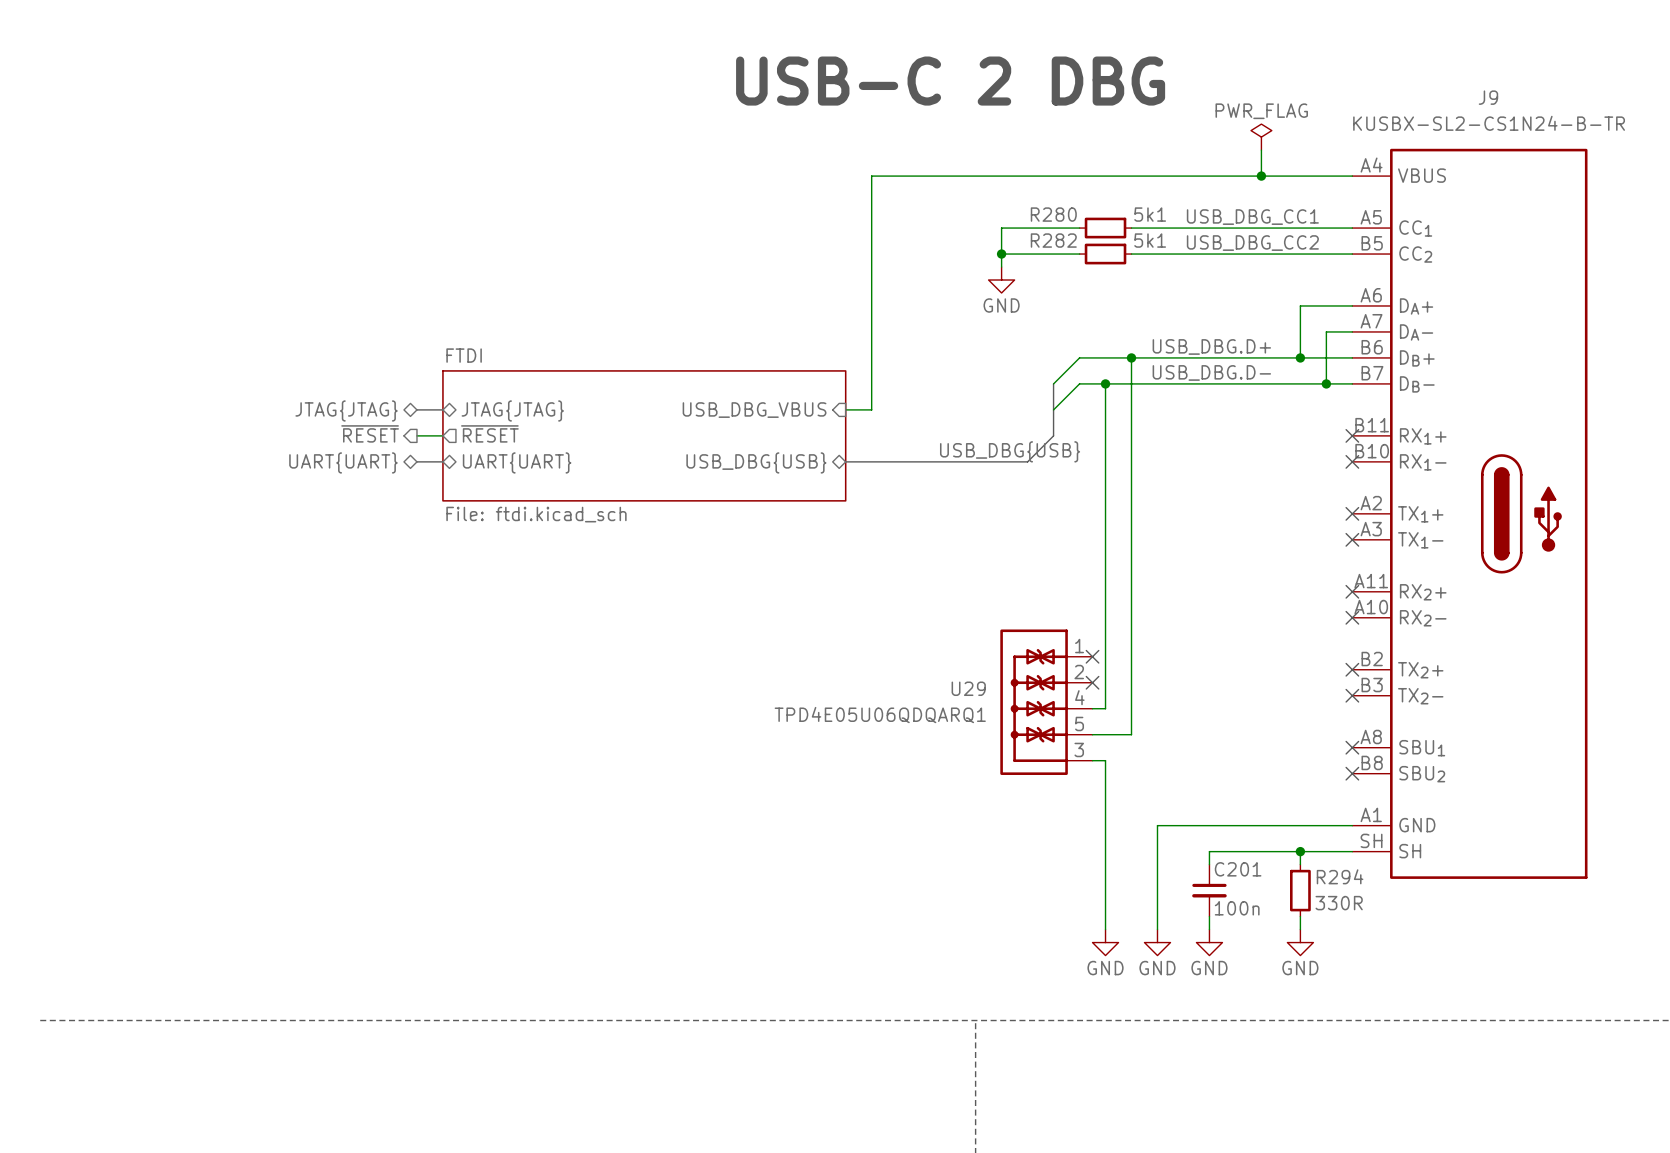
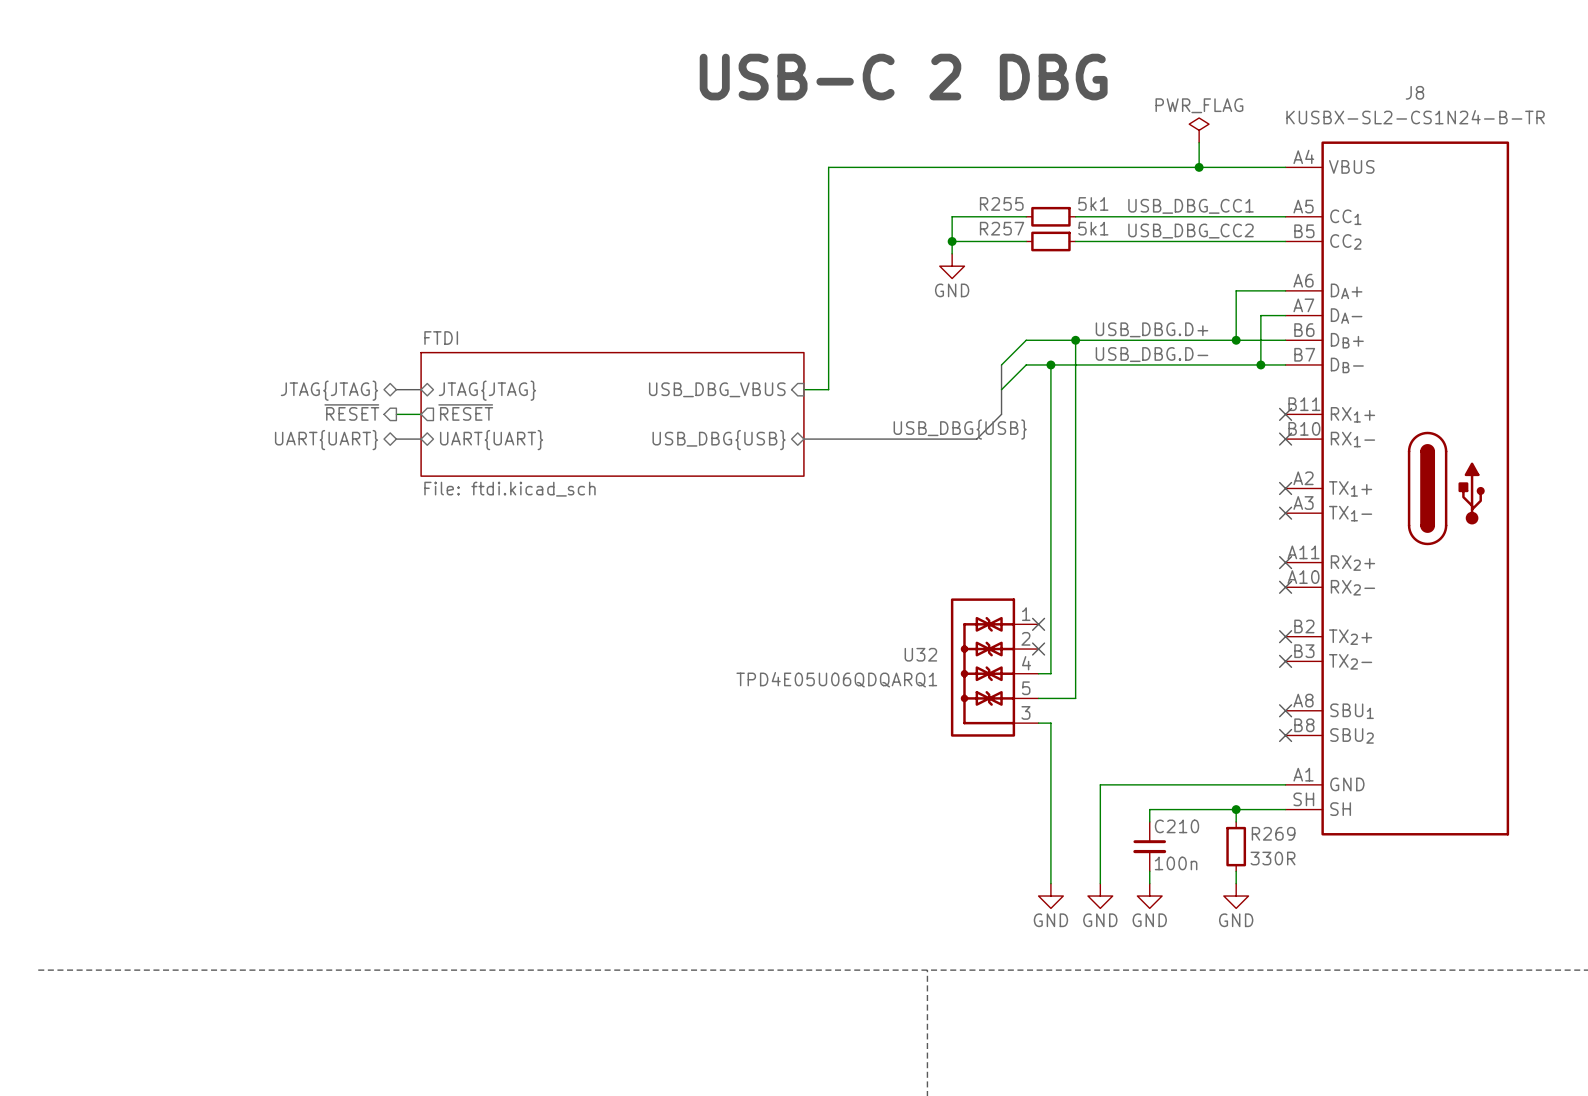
J9 name: J9 (1488, 97) -> J8 (1414, 92)
R280 name: R280 (1053, 214) -> R255 (1001, 203)
R282 name: R282 (1053, 240) -> R257 (1002, 228)
U29 name: U29 (968, 688) -> U32 (920, 654)
C201 name: C201 (1238, 869) -> C210 (1176, 826)
R294 name: R294 (1340, 876) -> R269 (1273, 833)

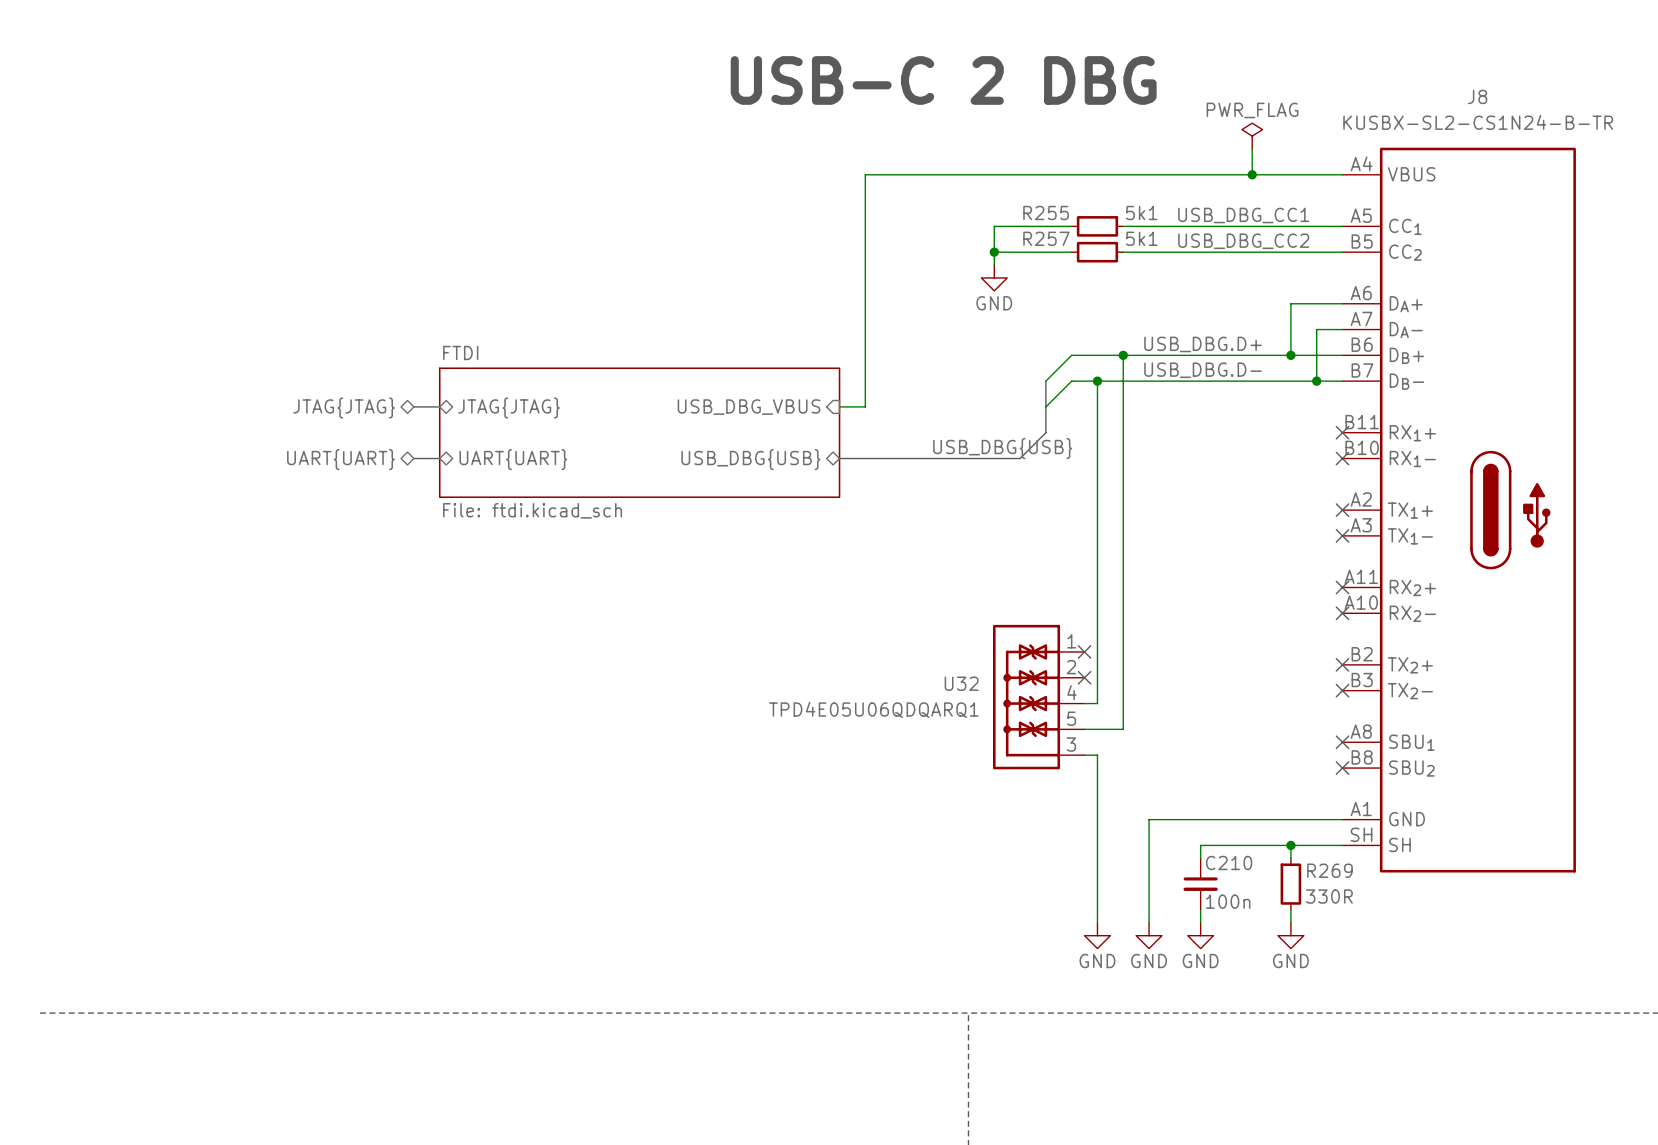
hierarchical label: ~{RESET} (351, 412) -> none
sheet pin: ~{RESET} (465, 412) -> none
wire: (396, 414) (421, 414) -> none

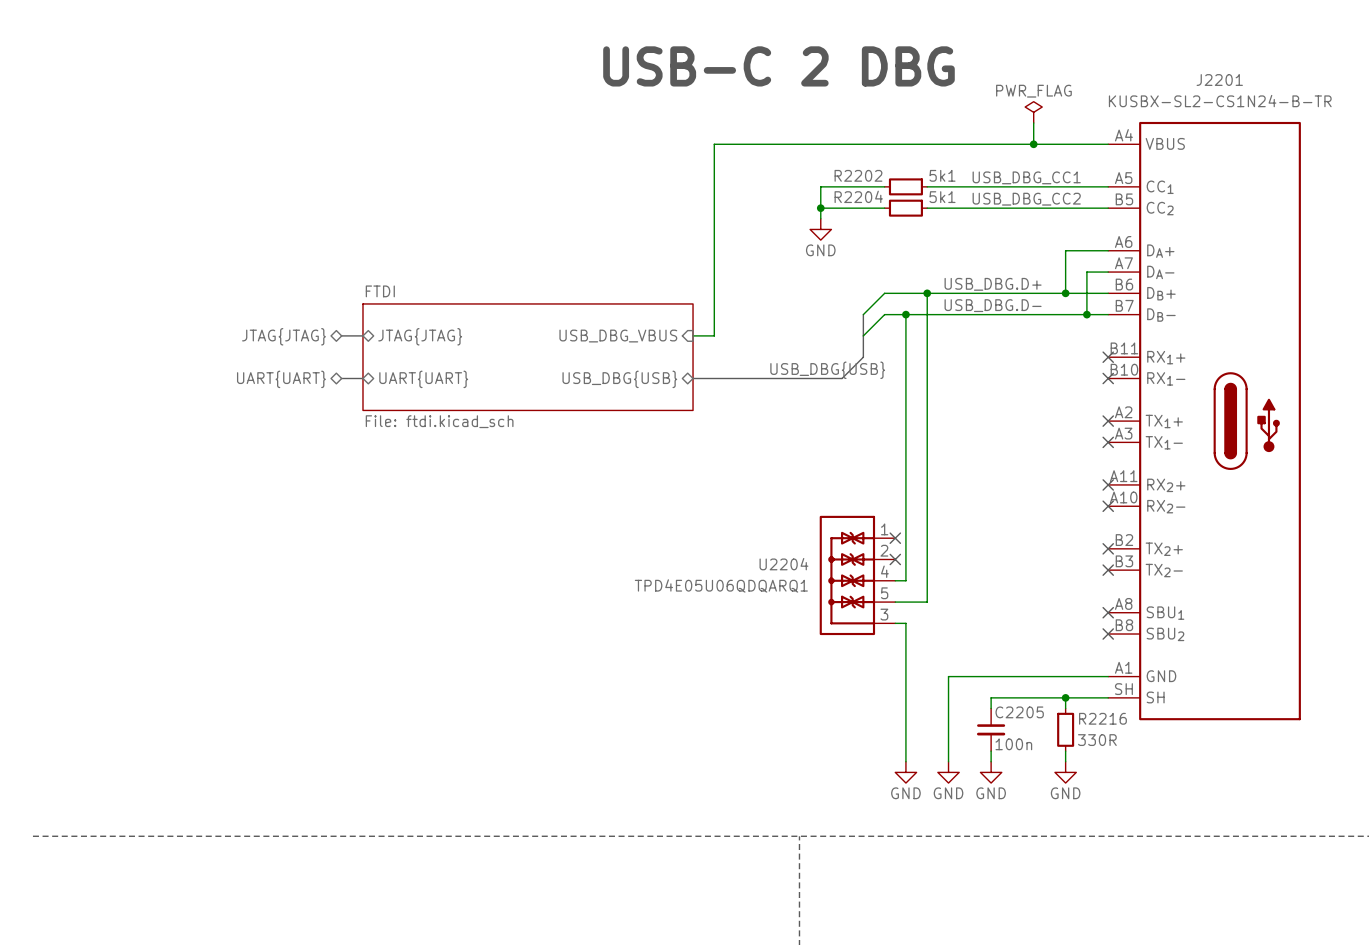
J8 name: J8 (1477, 96) -> J2201 (1219, 80)
R255 name: R255 (1046, 213) -> R2202 (858, 175)
R257 name: R257 (1046, 238) -> R2204 (858, 196)
U32 name: U32 (961, 683) -> U2204 (783, 564)
C210 name: C210 (1229, 862) -> C2205 (1019, 712)
R269 name: R269 (1329, 870) -> R2216 (1102, 718)

